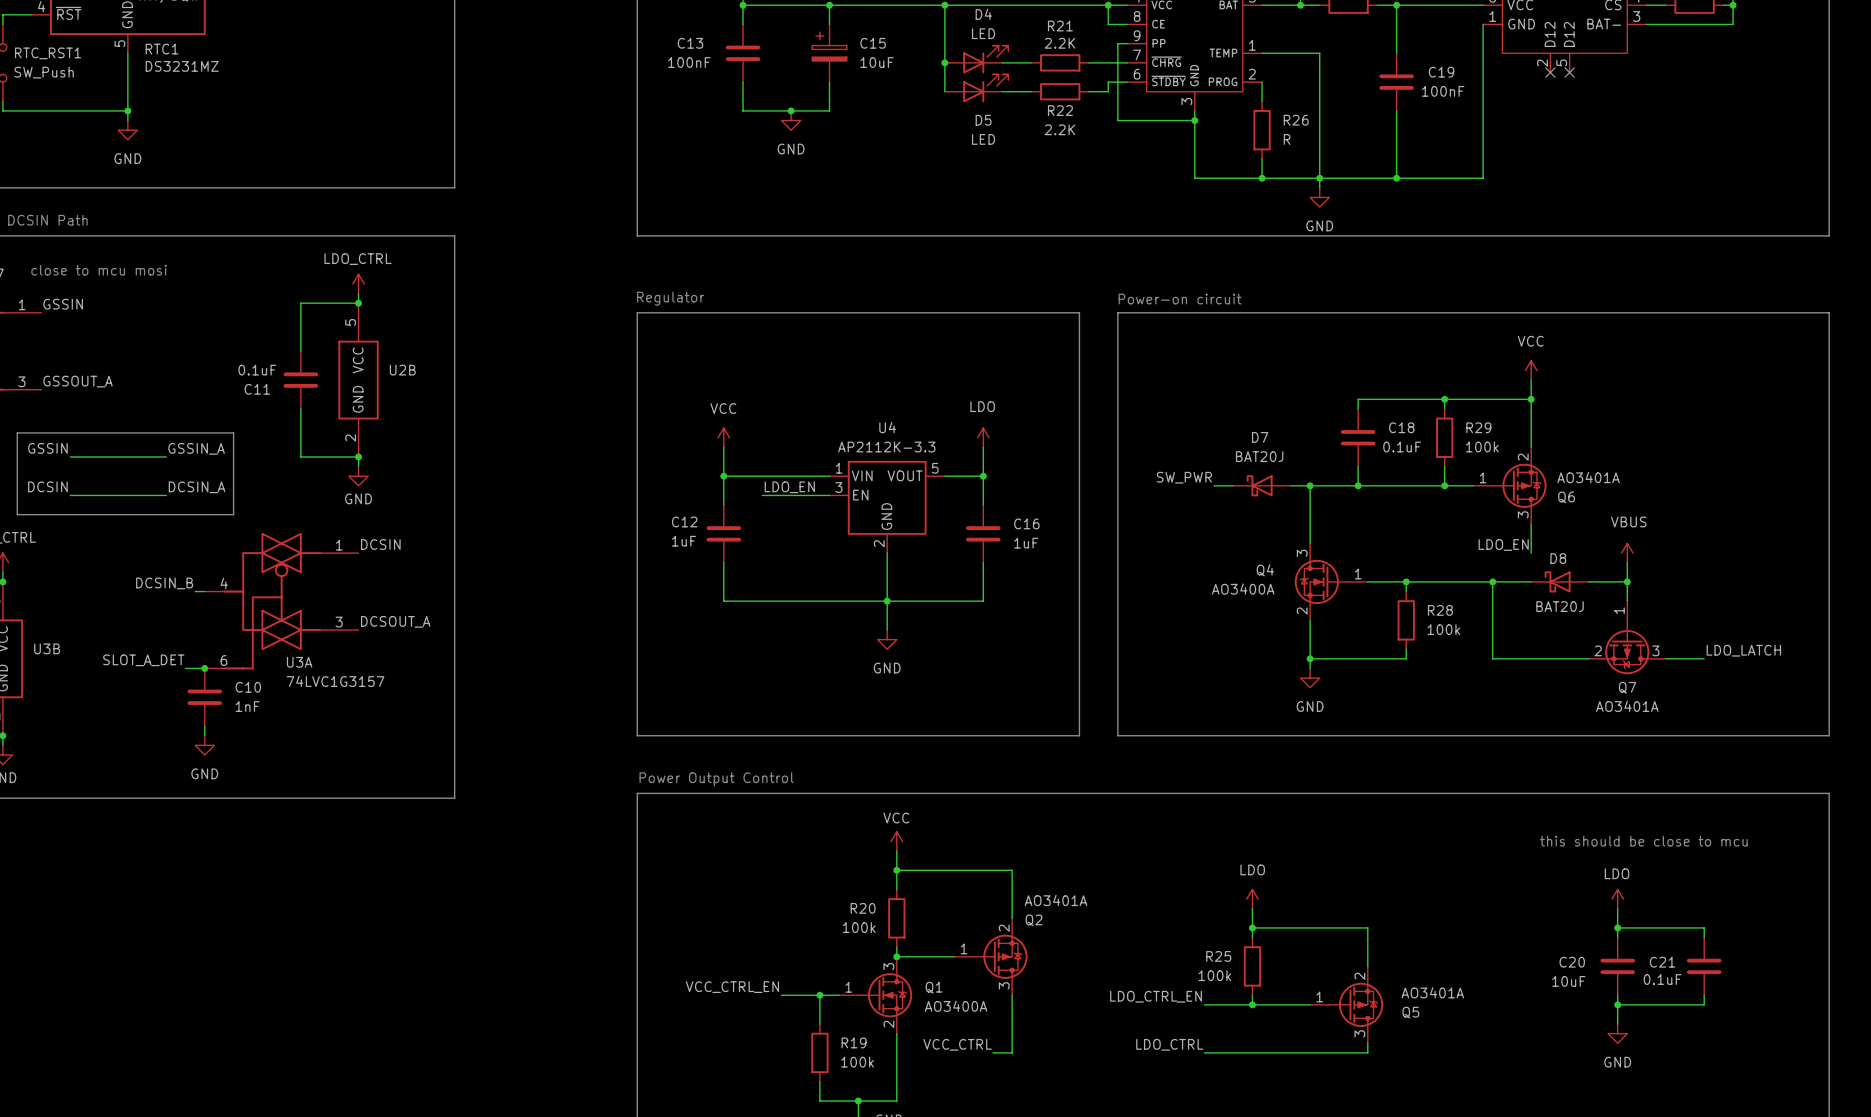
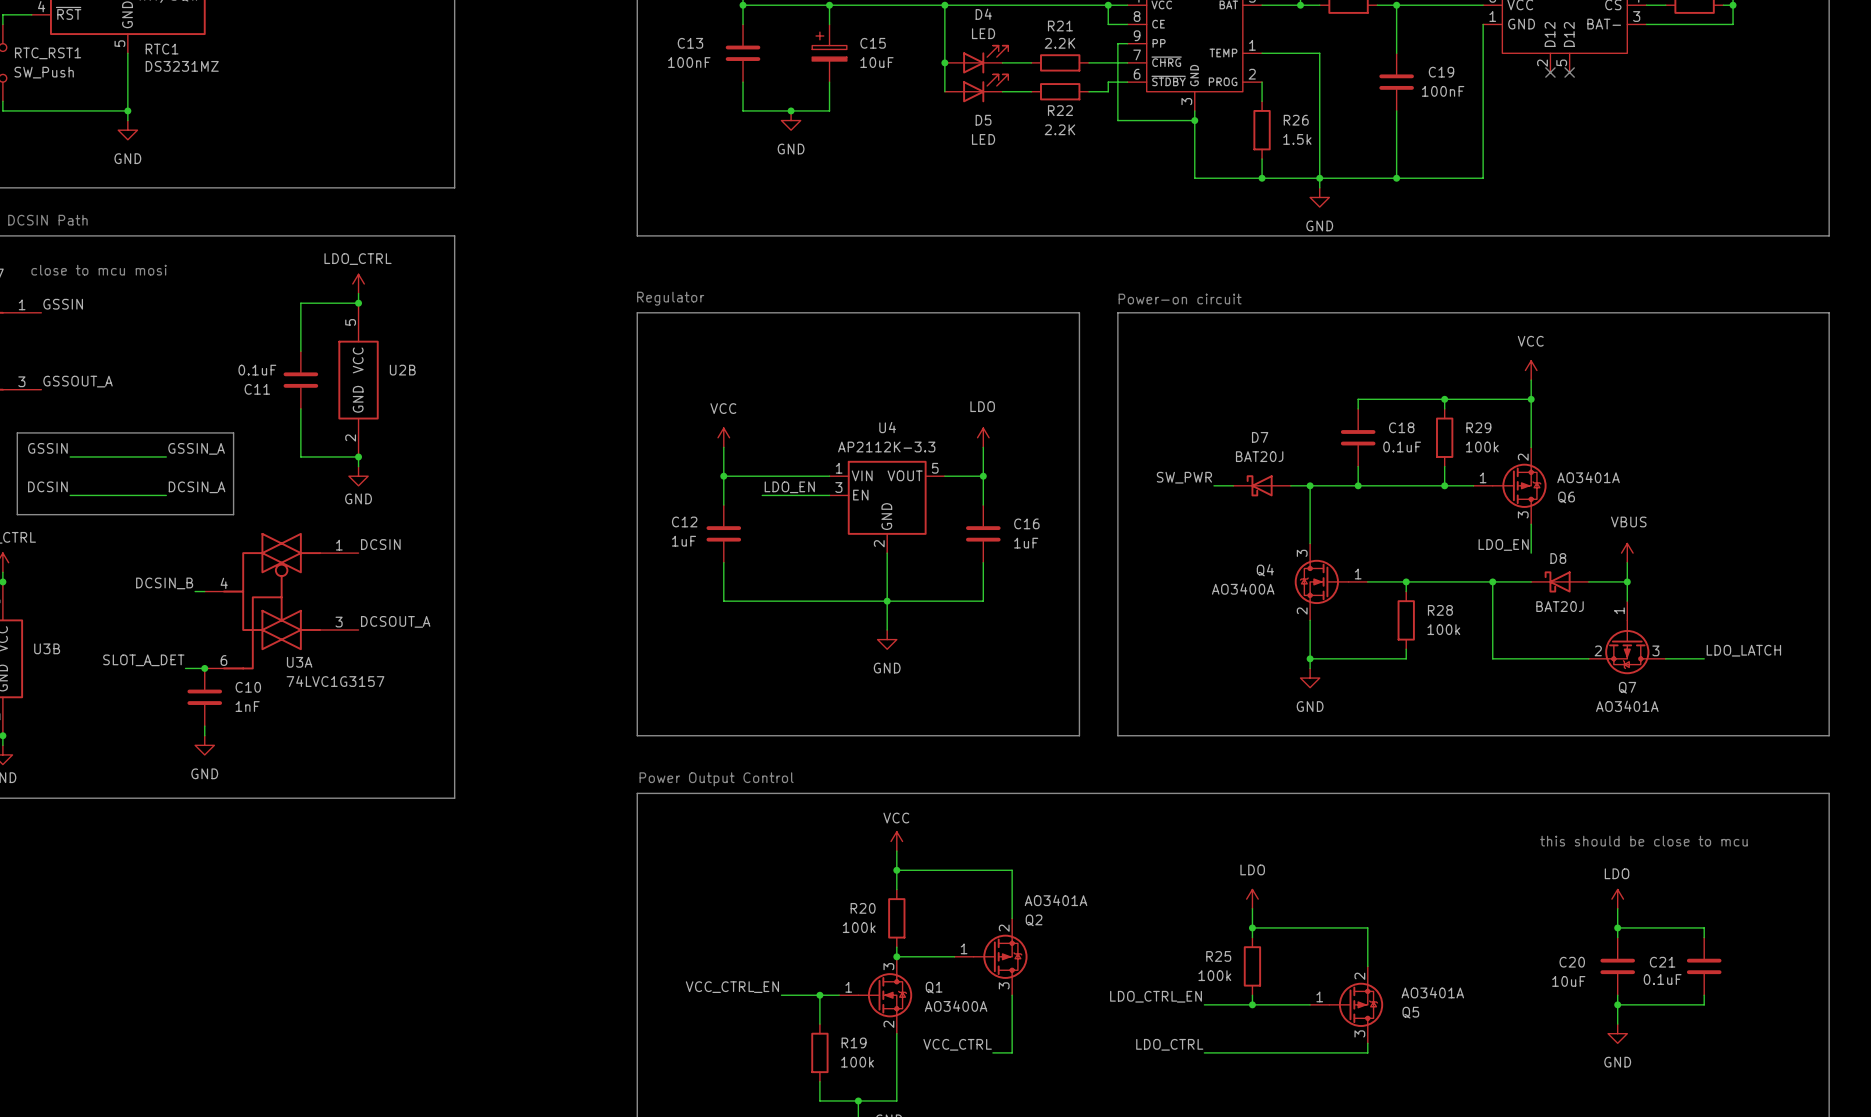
R26 value: R (1287, 139) -> 1.5k (1297, 139)

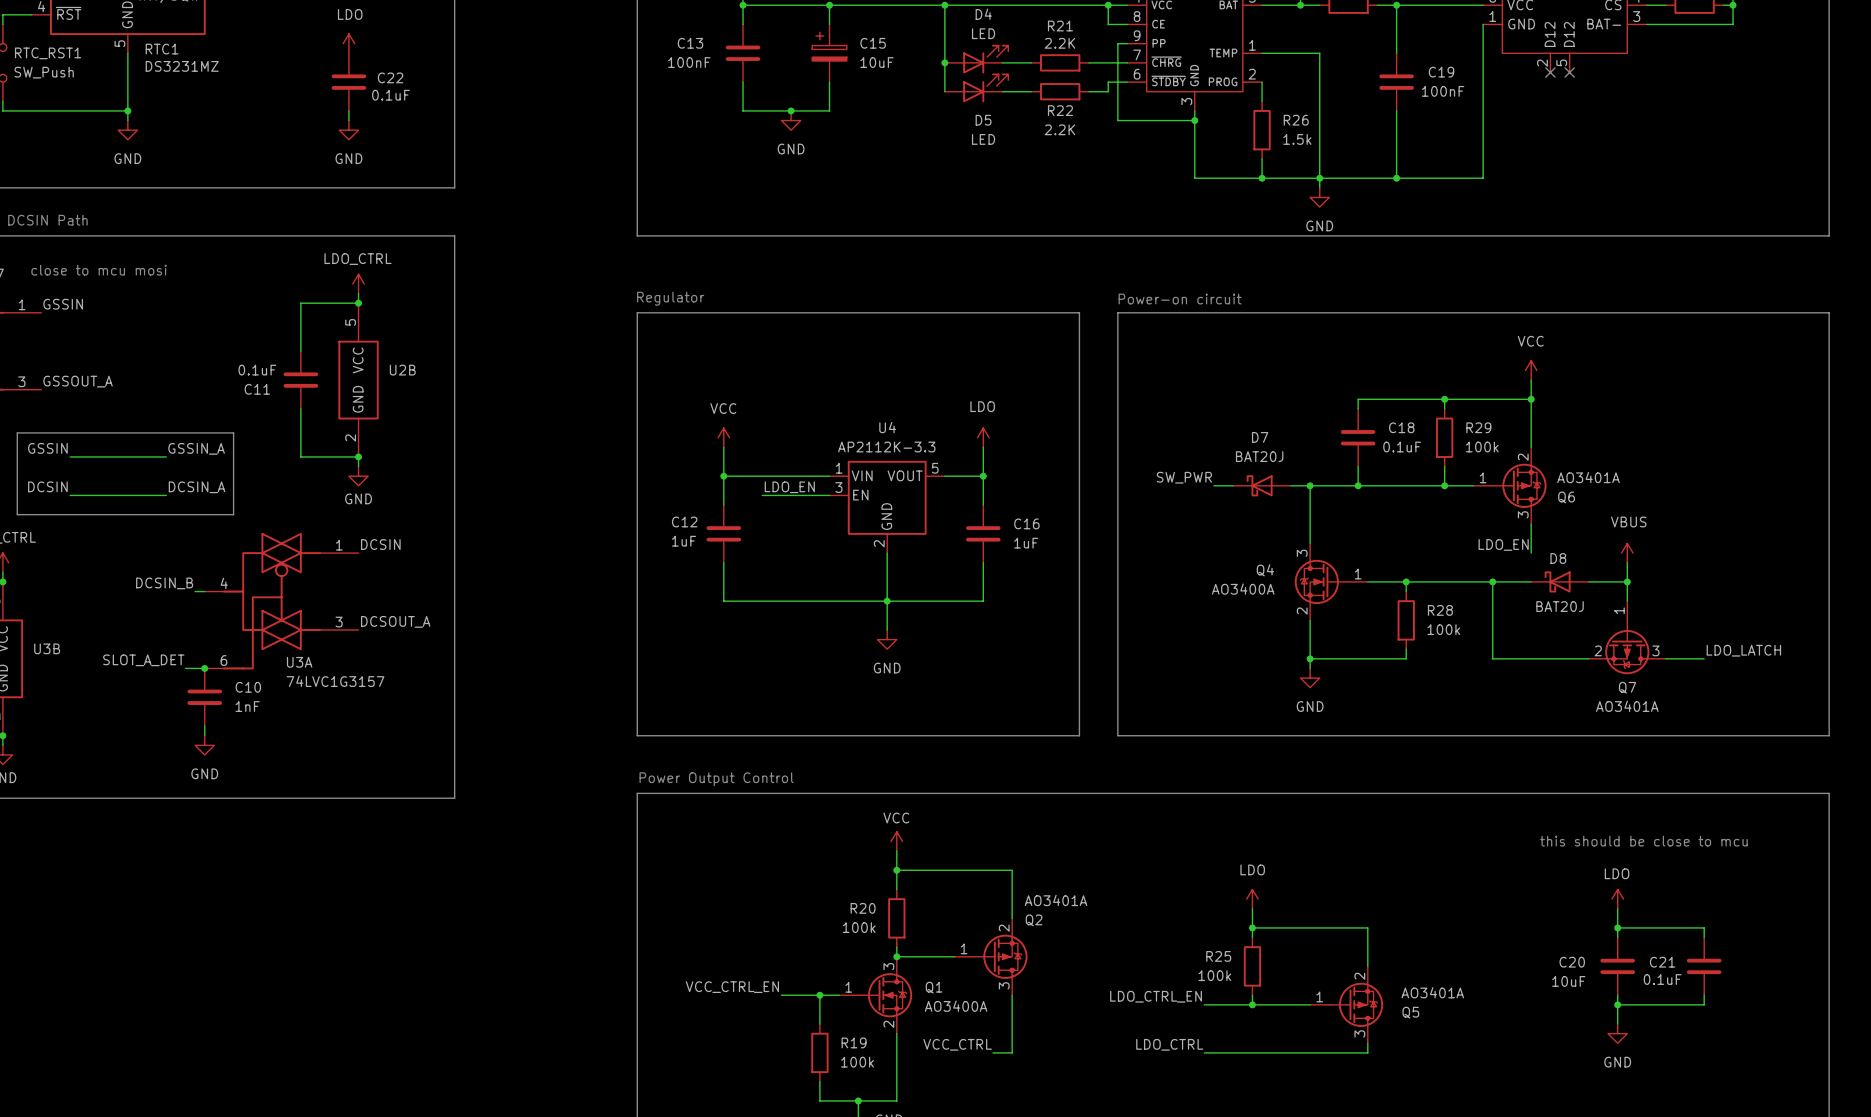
power symbol: none -> LDO (348, 43)
C22: none -> 0.1uF (348, 82)
wire: none -> (348, 110) (348, 120)
power symbol: none -> GND (348, 130)

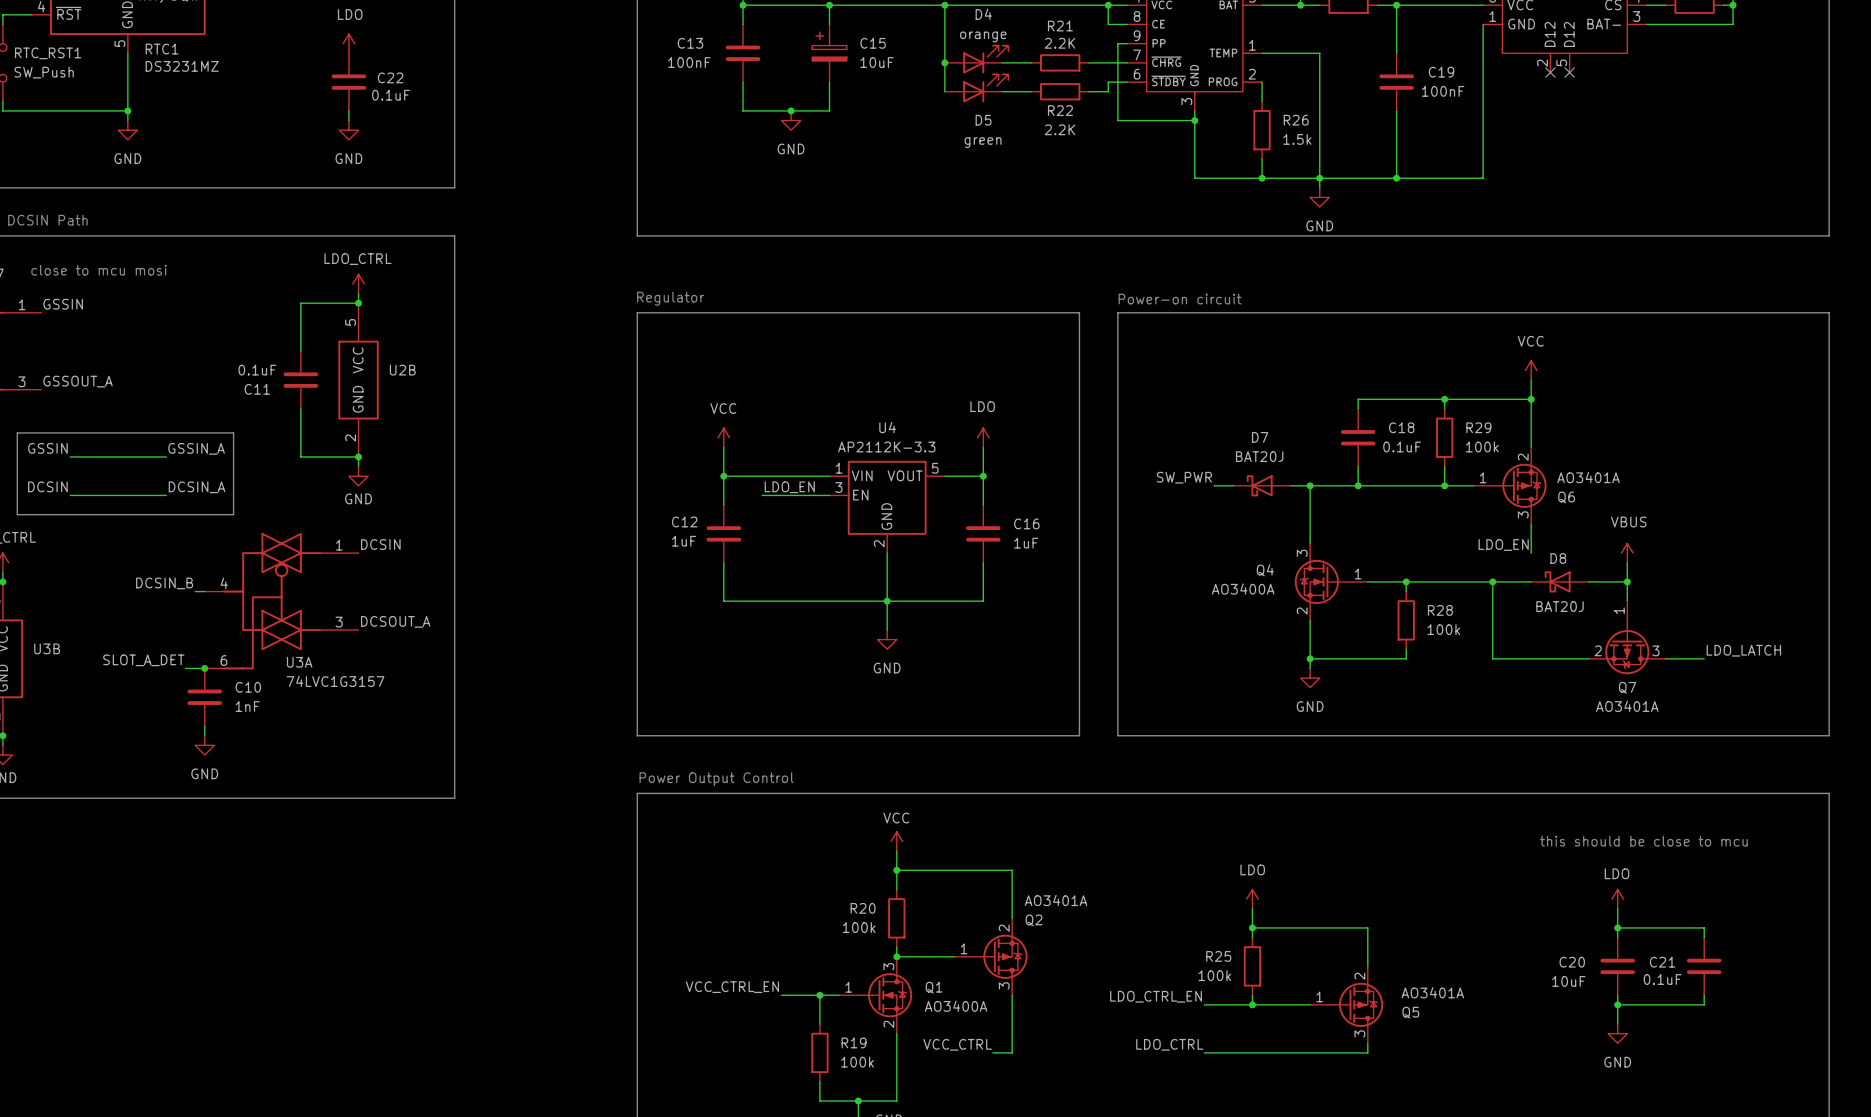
D4 value: LED (983, 33) -> orange (983, 36)
D5 value: LED (983, 139) -> green (983, 142)

